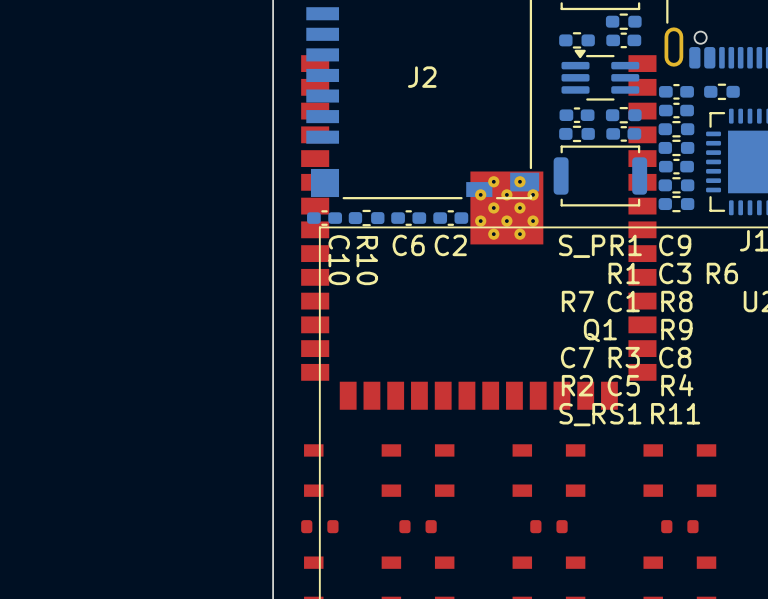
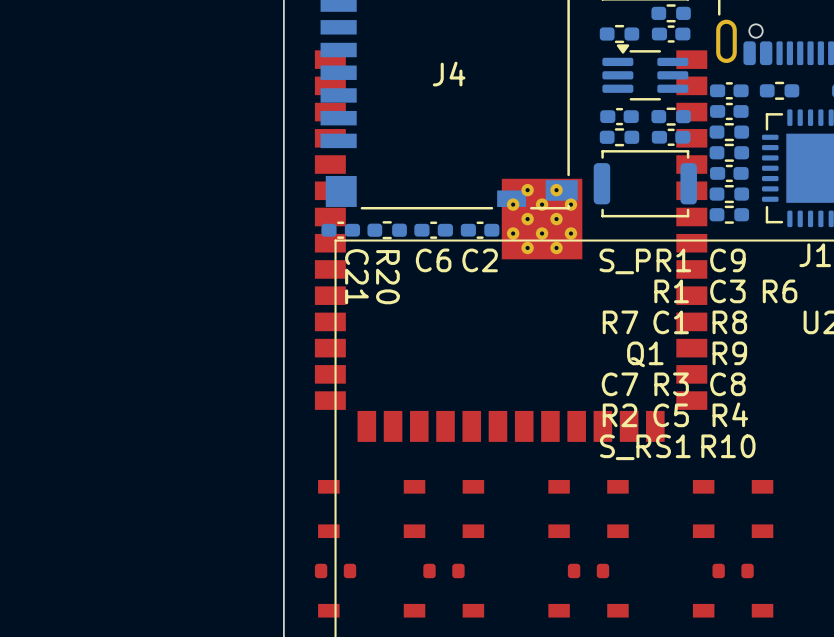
J2 name: J2 (422, 77) -> J4 (449, 74)
C10 name: C10 (339, 260) -> C21 (356, 276)
R10 name: R10 (367, 260) -> R20 (387, 277)
R11 name: R11 (675, 413) -> R10 (728, 446)

